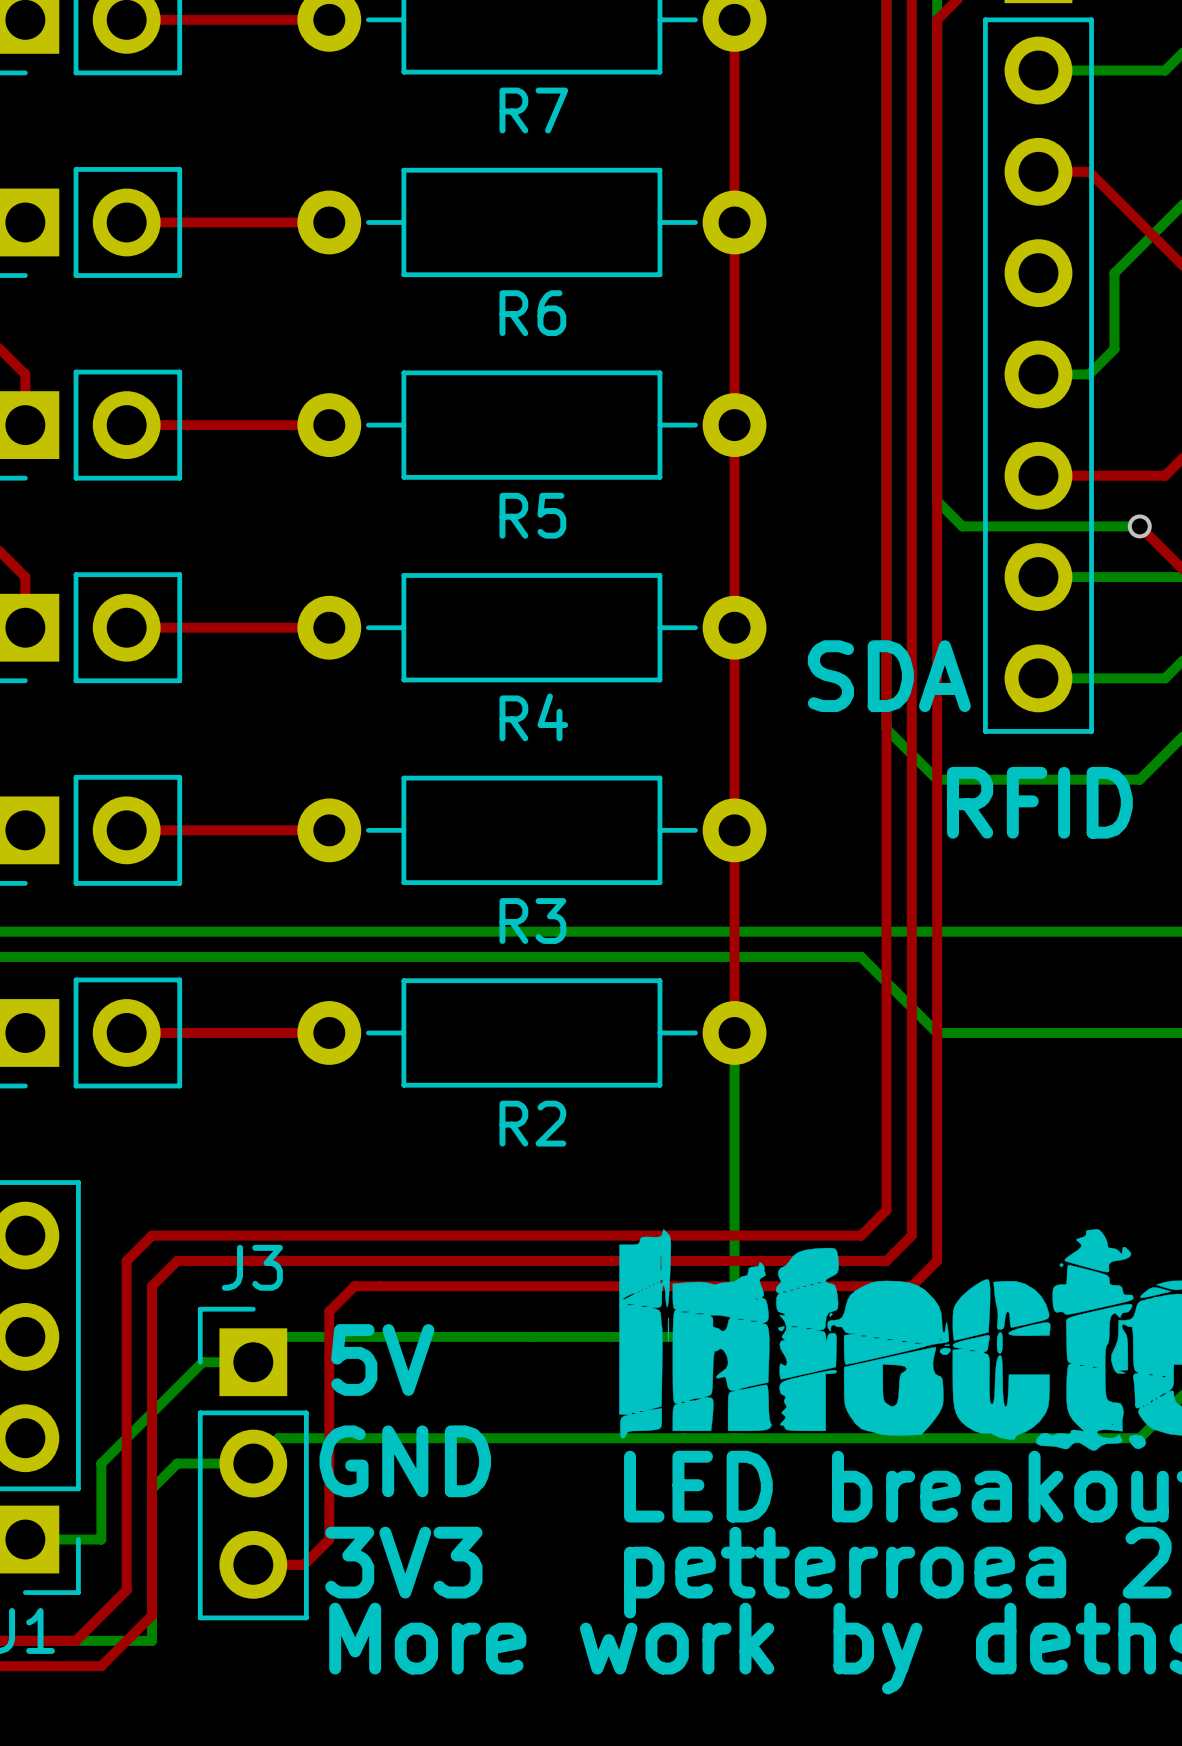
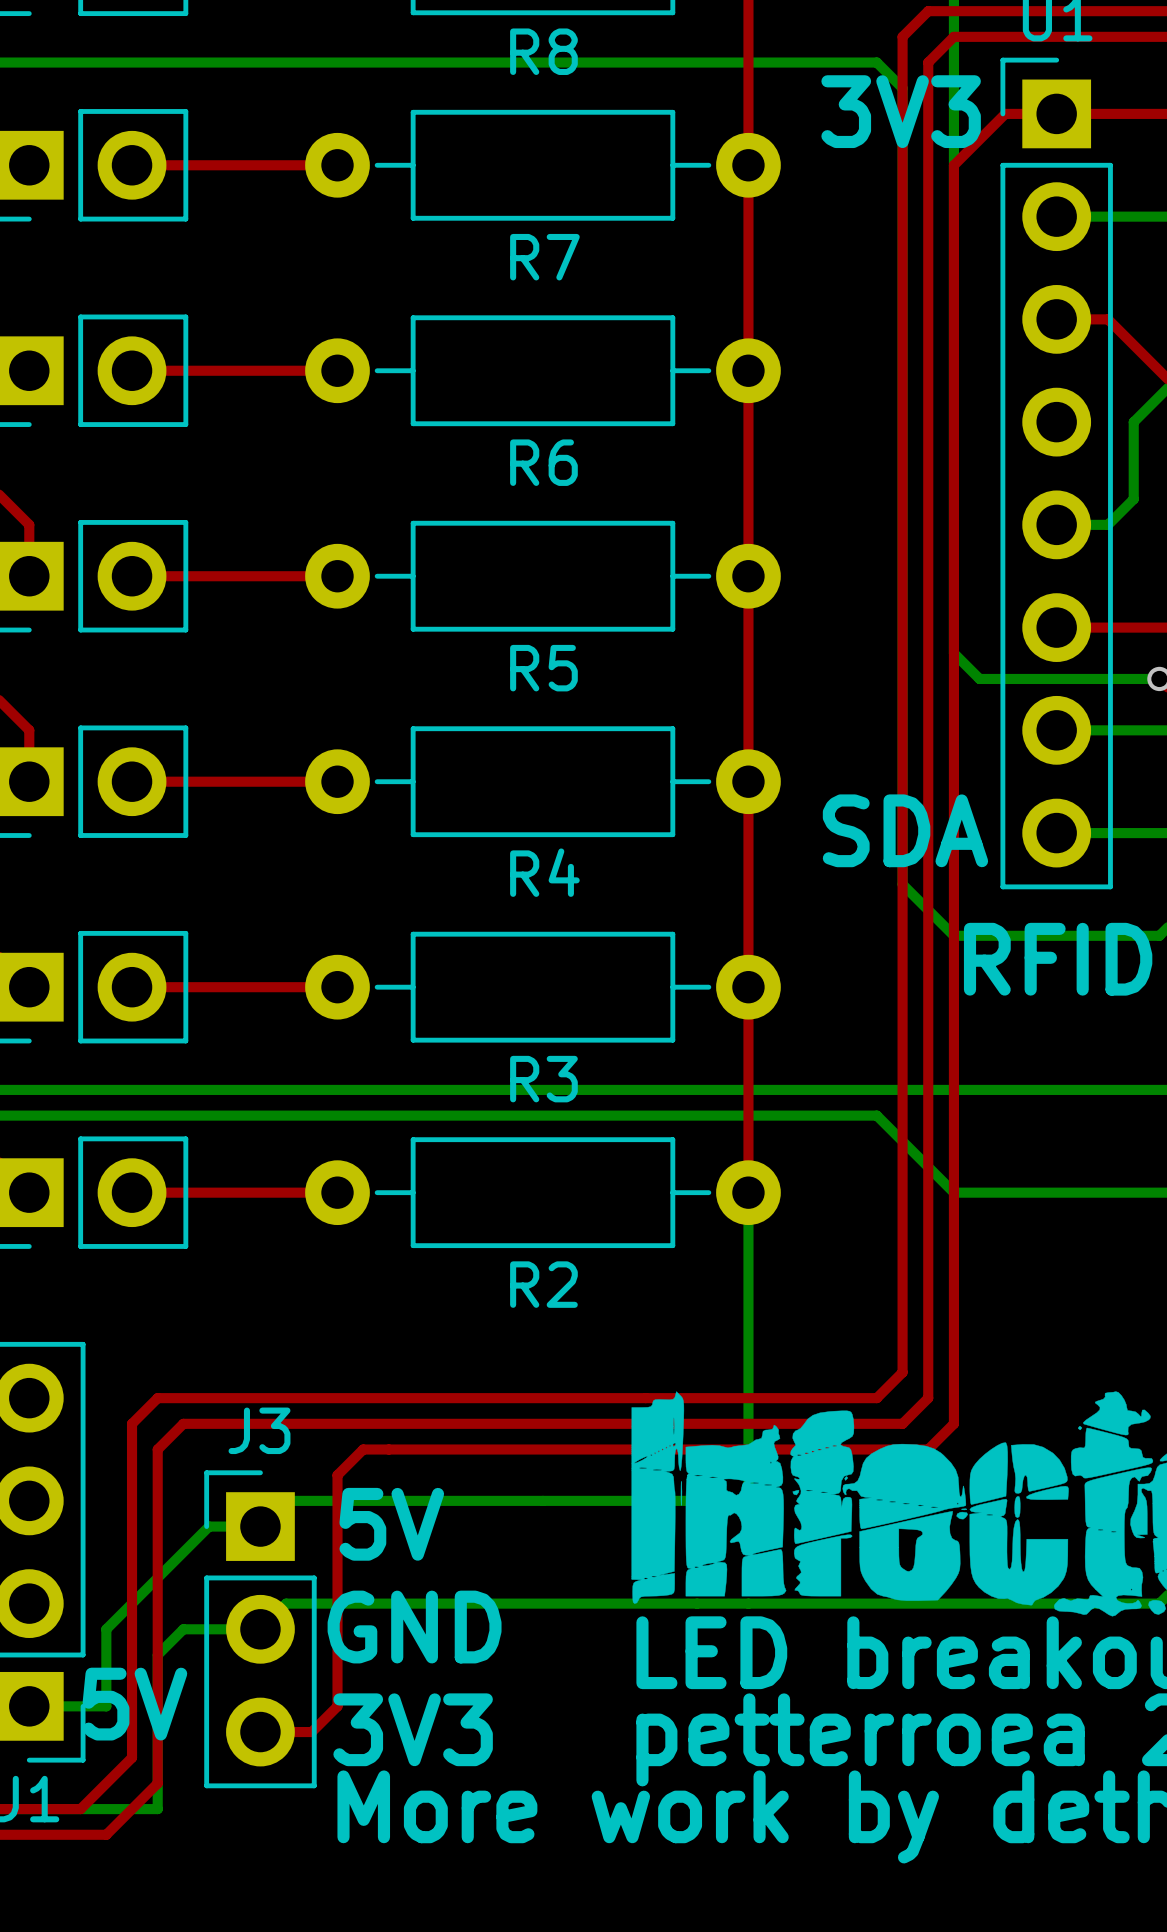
text: none -> 5V (134, 1704)

